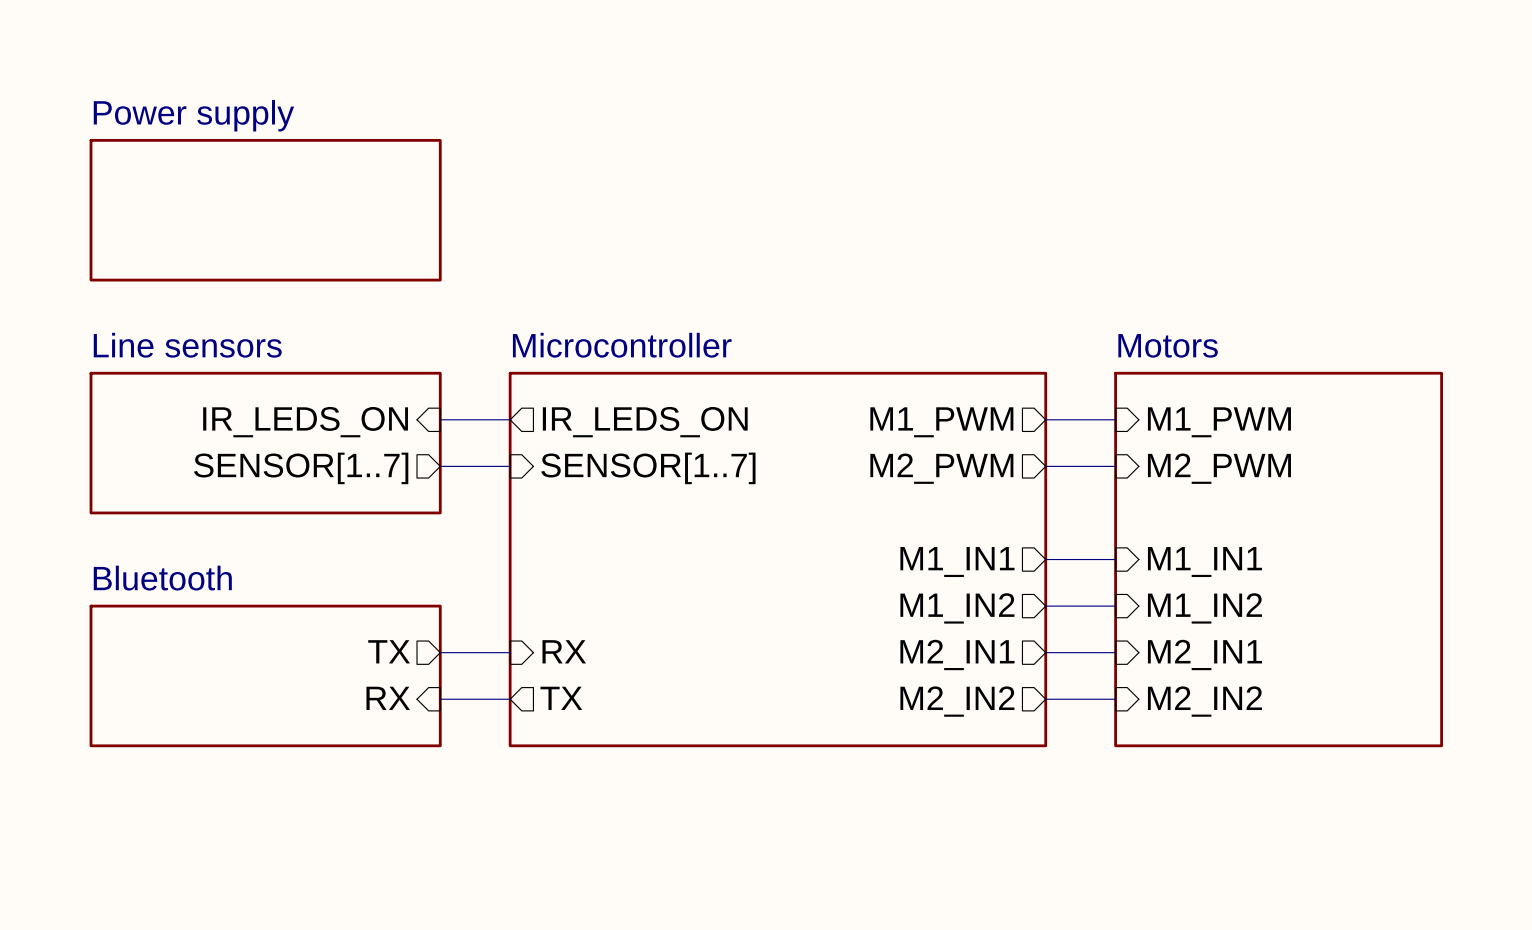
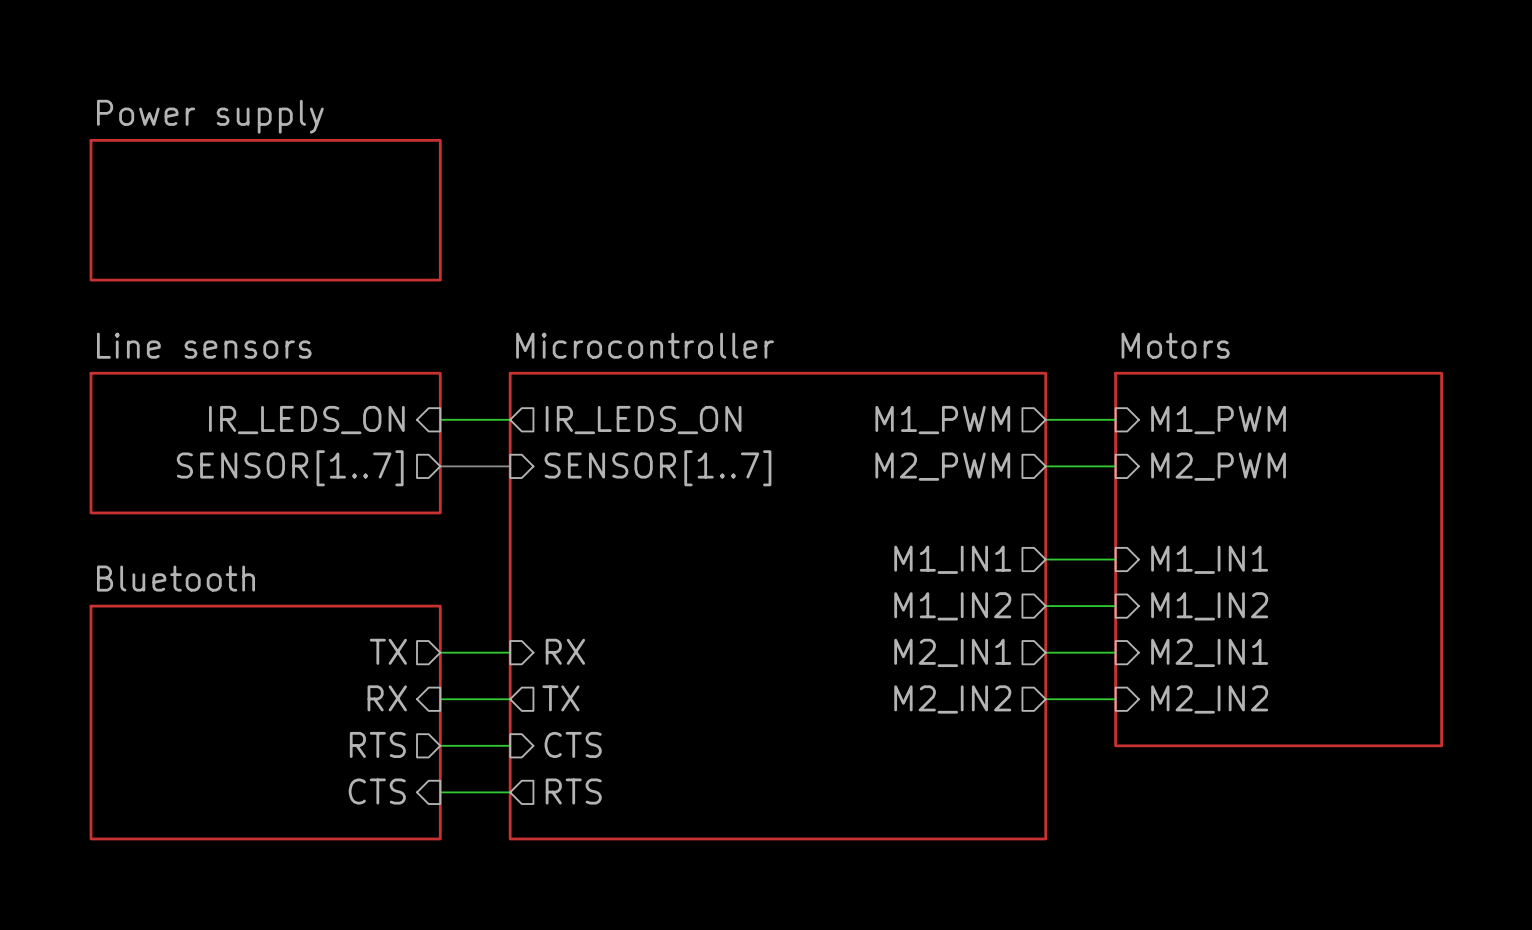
sheet Microcontroller: (777, 559) -> none
sheet Microcontroller: none -> (777, 606)
sheet Bluetooth: (265, 675) -> none
sheet Bluetooth: none -> (265, 722)
sheet pin: none -> RTS (377, 744)
sheet pin: none -> CTS (573, 744)
wire: none -> (440, 745) (510, 745)
sheet pin: none -> CTS (377, 791)
sheet pin: none -> RTS (573, 791)
wire: none -> (440, 792) (510, 792)

